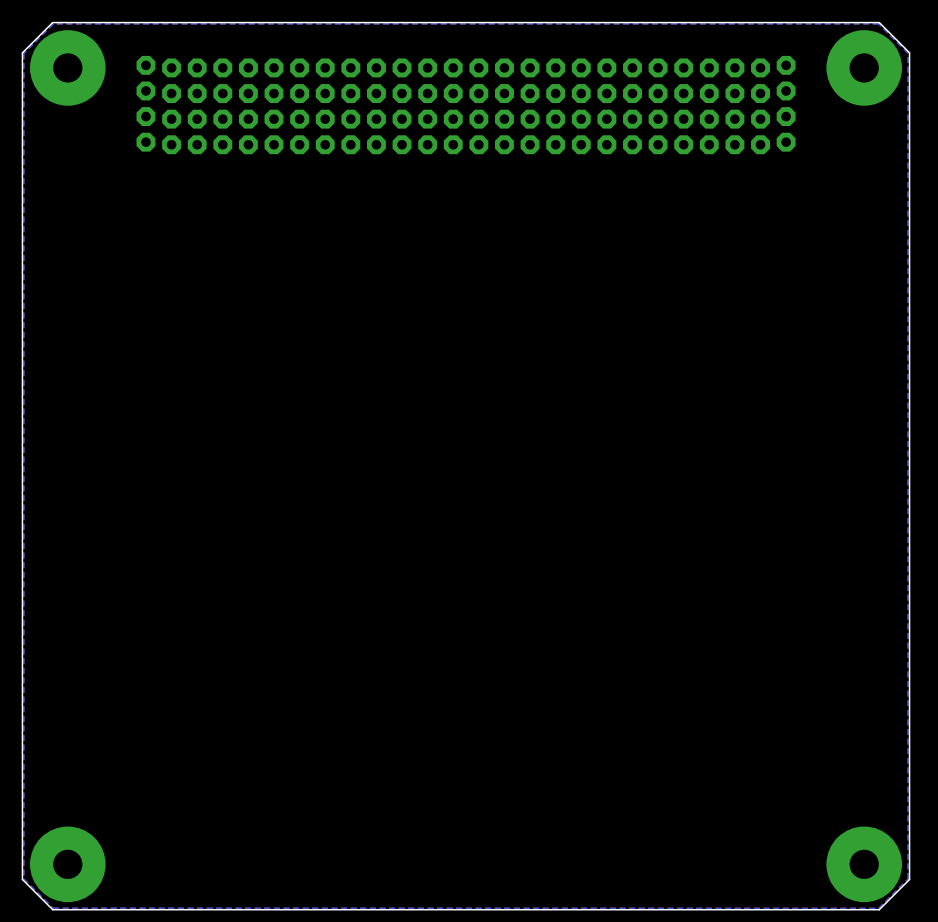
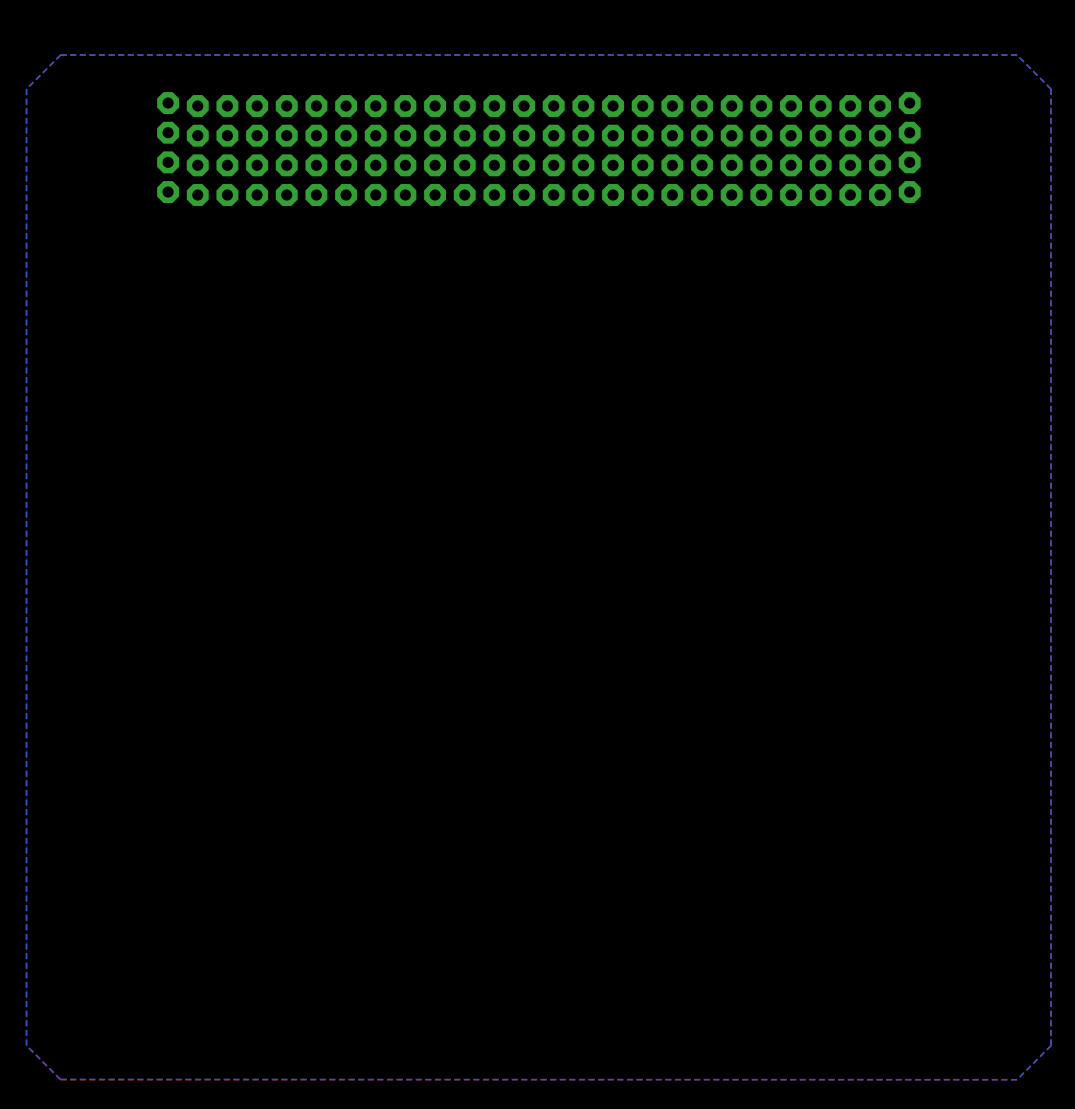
part: (466, 466) -> none

